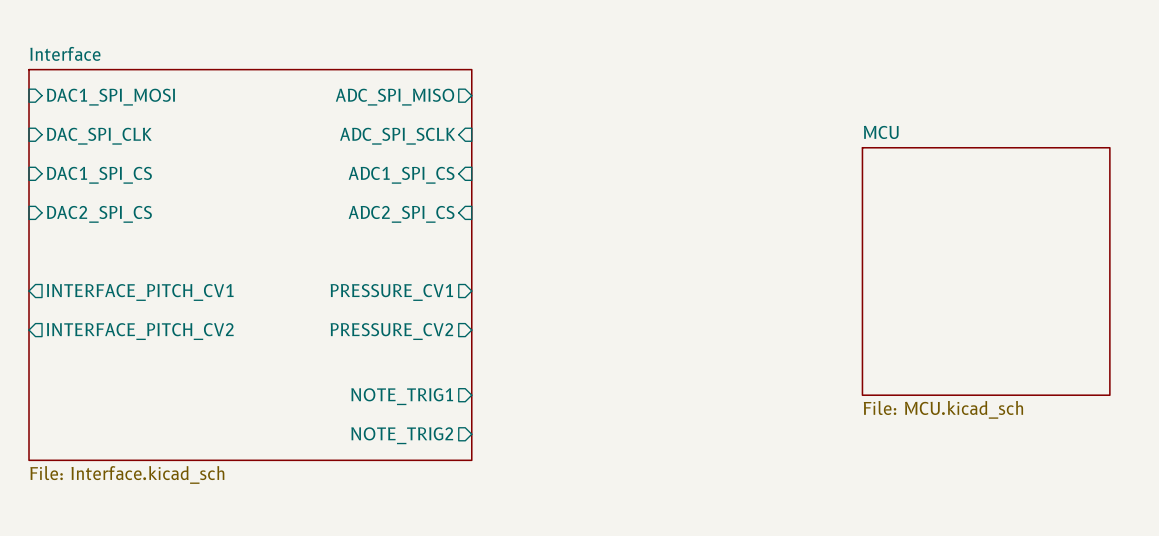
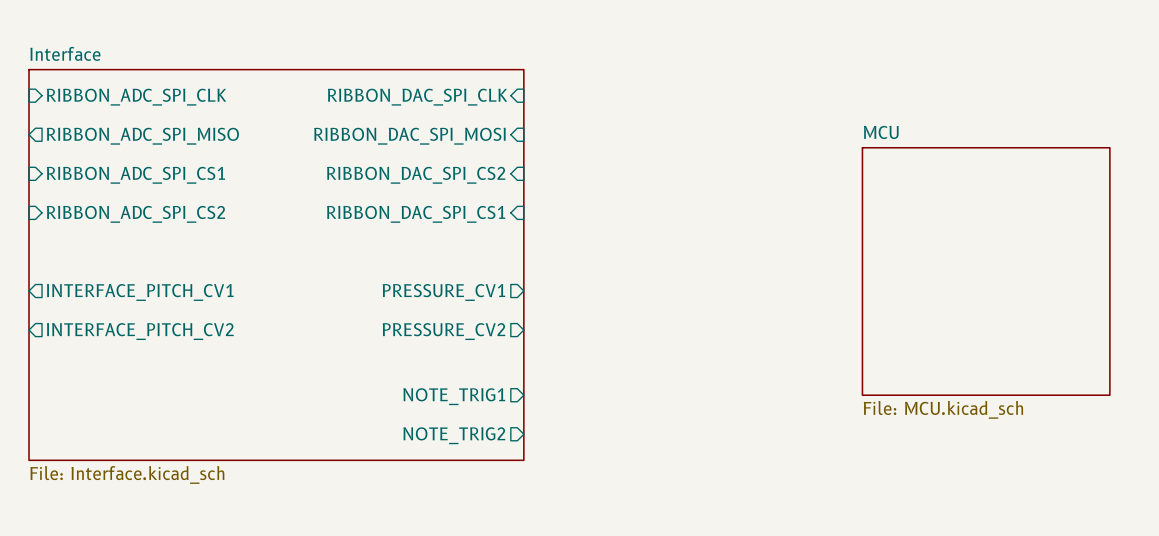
sheet pin: DAC1_SPI_MOSI (110, 97) -> RIBBON_ADC_SPI_CLK (136, 97)
sheet pin: ADC_SPI_MISO (394, 97) -> none
sheet pin: none -> RIBBON_DAC_SPI_CLK (417, 97)
sheet pin shape: input (99, 136) -> output (142, 136)
sheet pin: DAC_SPI_CLK (99, 136) -> RIBBON_ADC_SPI_MISO (142, 136)
sheet pin: ADC_SPI_SCLK (397, 136) -> none
sheet pin: none -> RIBBON_DAC_SPI_MOSI (409, 136)
sheet pin: DAC1_SPI_CS (99, 175) -> RIBBON_ADC_SPI_CS1 (135, 175)
sheet pin: ADC1_SPI_CS (401, 175) -> RIBBON_DAC_SPI_CS2 (416, 175)
sheet pin: DAC2_SPI_CS (99, 214) -> RIBBON_ADC_SPI_CS2 (135, 214)
sheet pin: ADC2_SPI_CS (401, 214) -> RIBBON_DAC_SPI_CS1 (416, 214)
sheet Interface: File: Interface.kicad_sch (250, 264) -> none
sheet Interface: none -> File: Interface.kicad_sch (276, 264)
sheet pin position: PRESSURE_CV1 (391, 292) -> PRESSURE_CV1 (443, 292)
sheet pin position: PRESSURE_CV2 (391, 331) -> PRESSURE_CV2 (443, 331)
sheet pin position: NOTE_TRIG1 (402, 396) -> NOTE_TRIG1 (454, 396)
sheet pin position: NOTE_TRIG2 (402, 435) -> NOTE_TRIG2 (454, 435)

